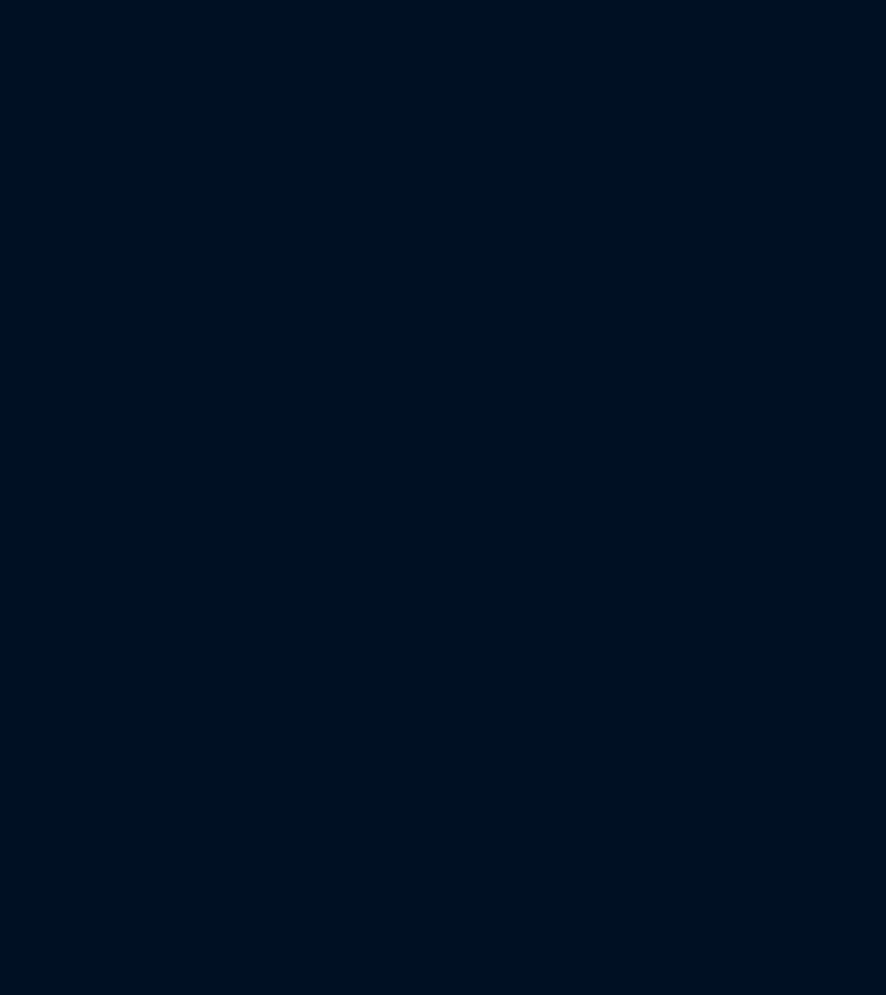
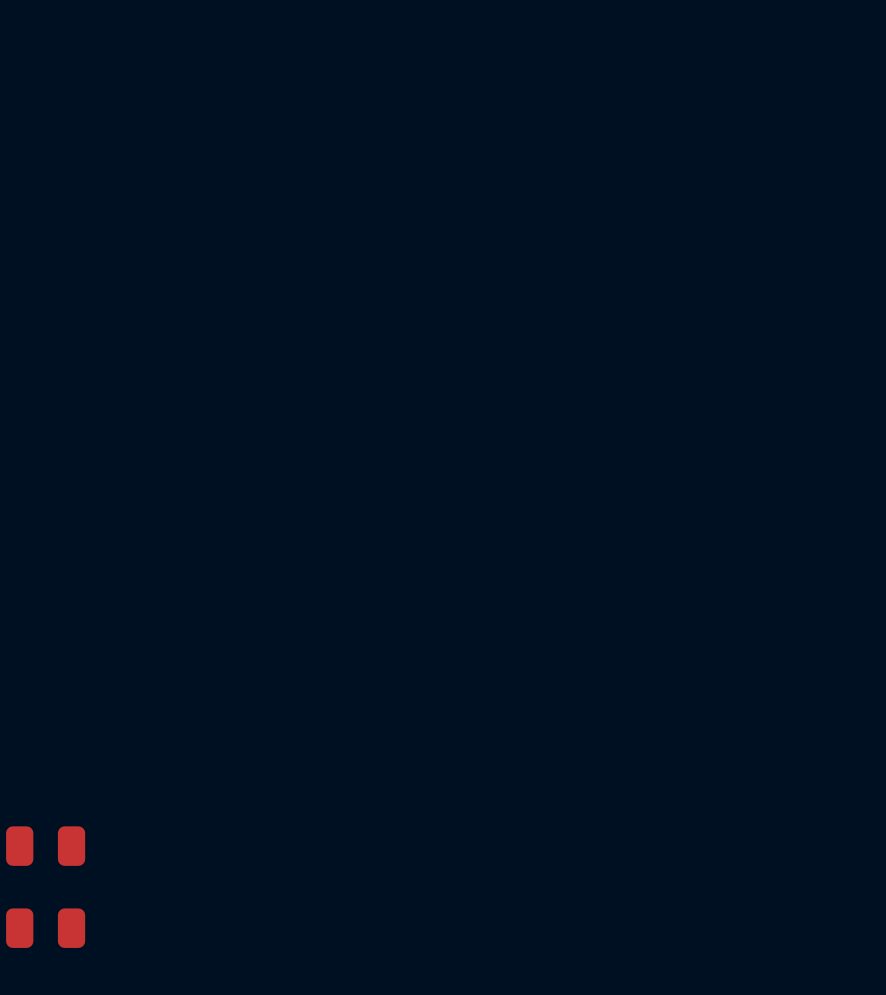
part: none -> (45, 846)
part: none -> (45, 928)

